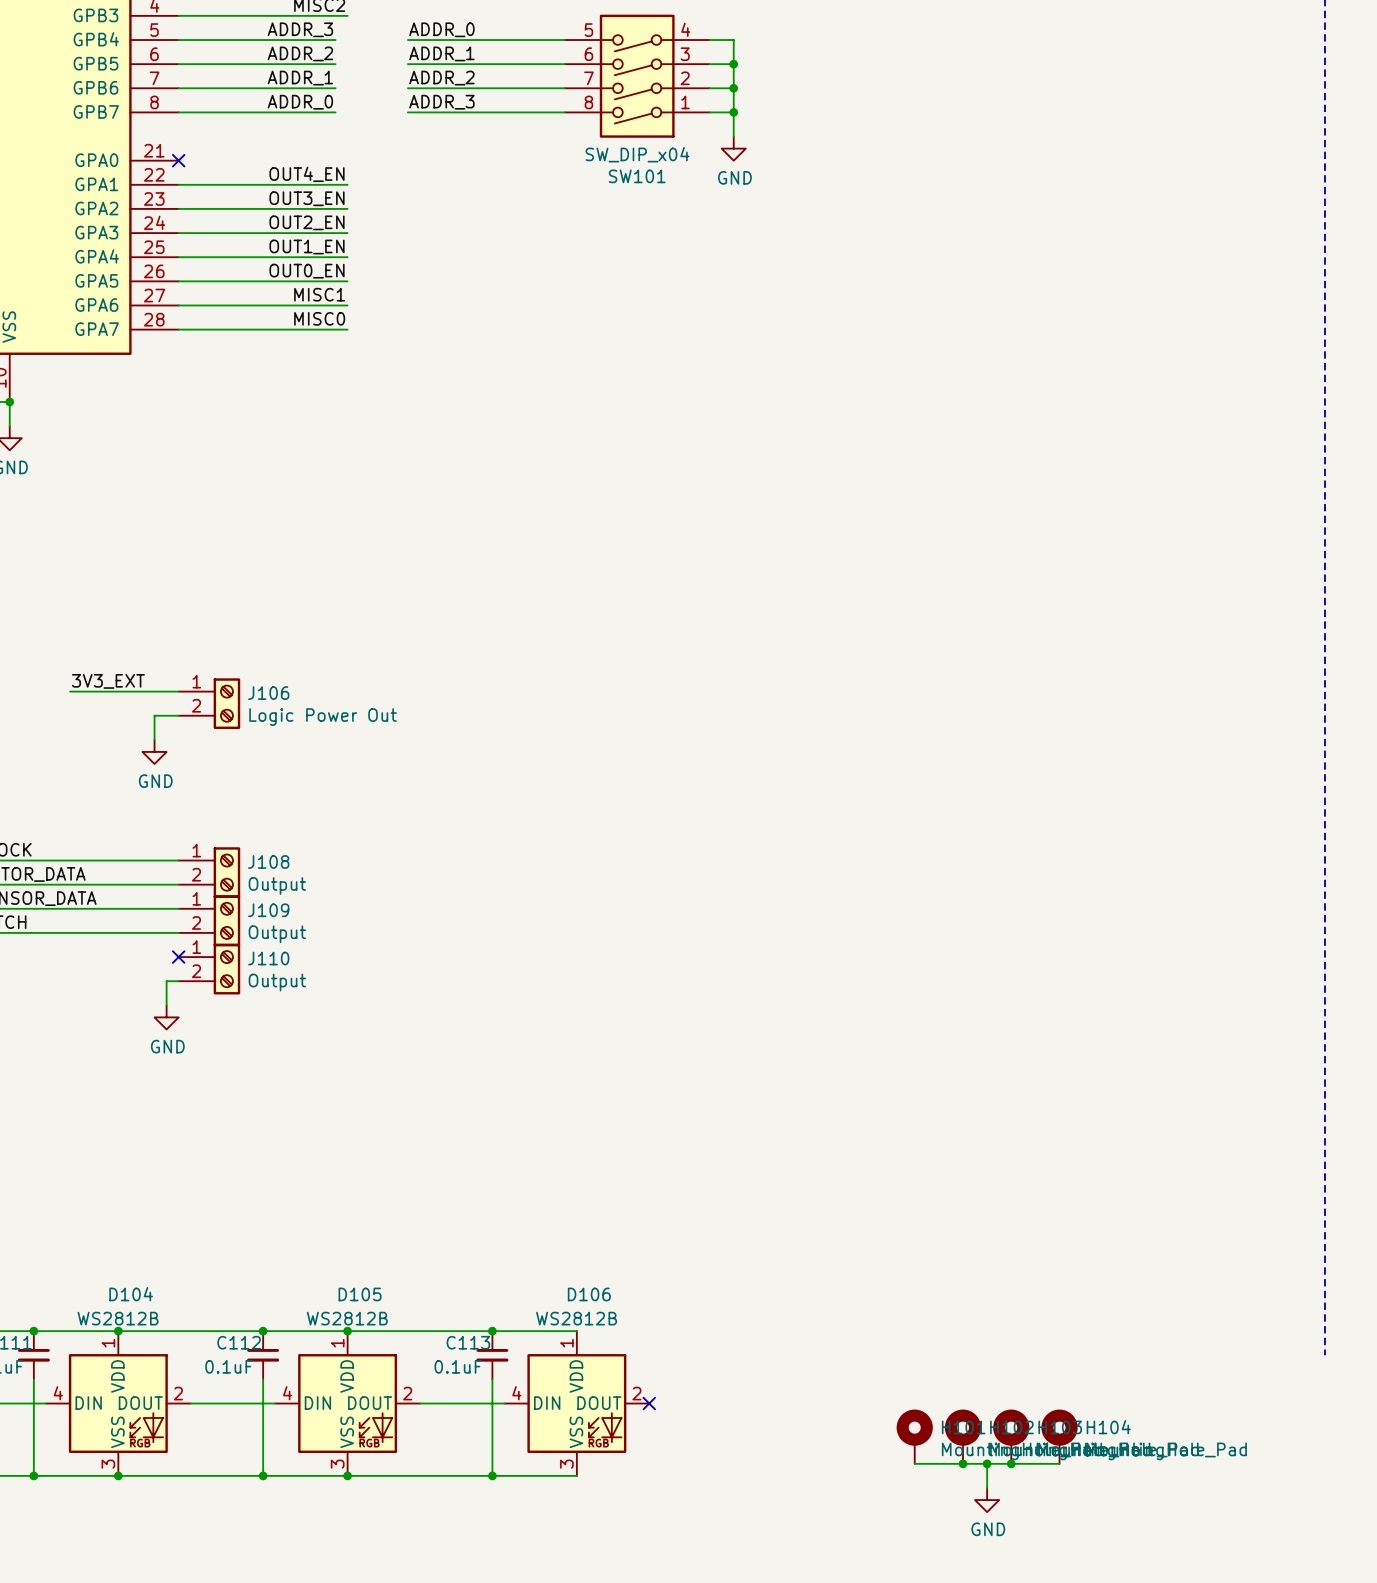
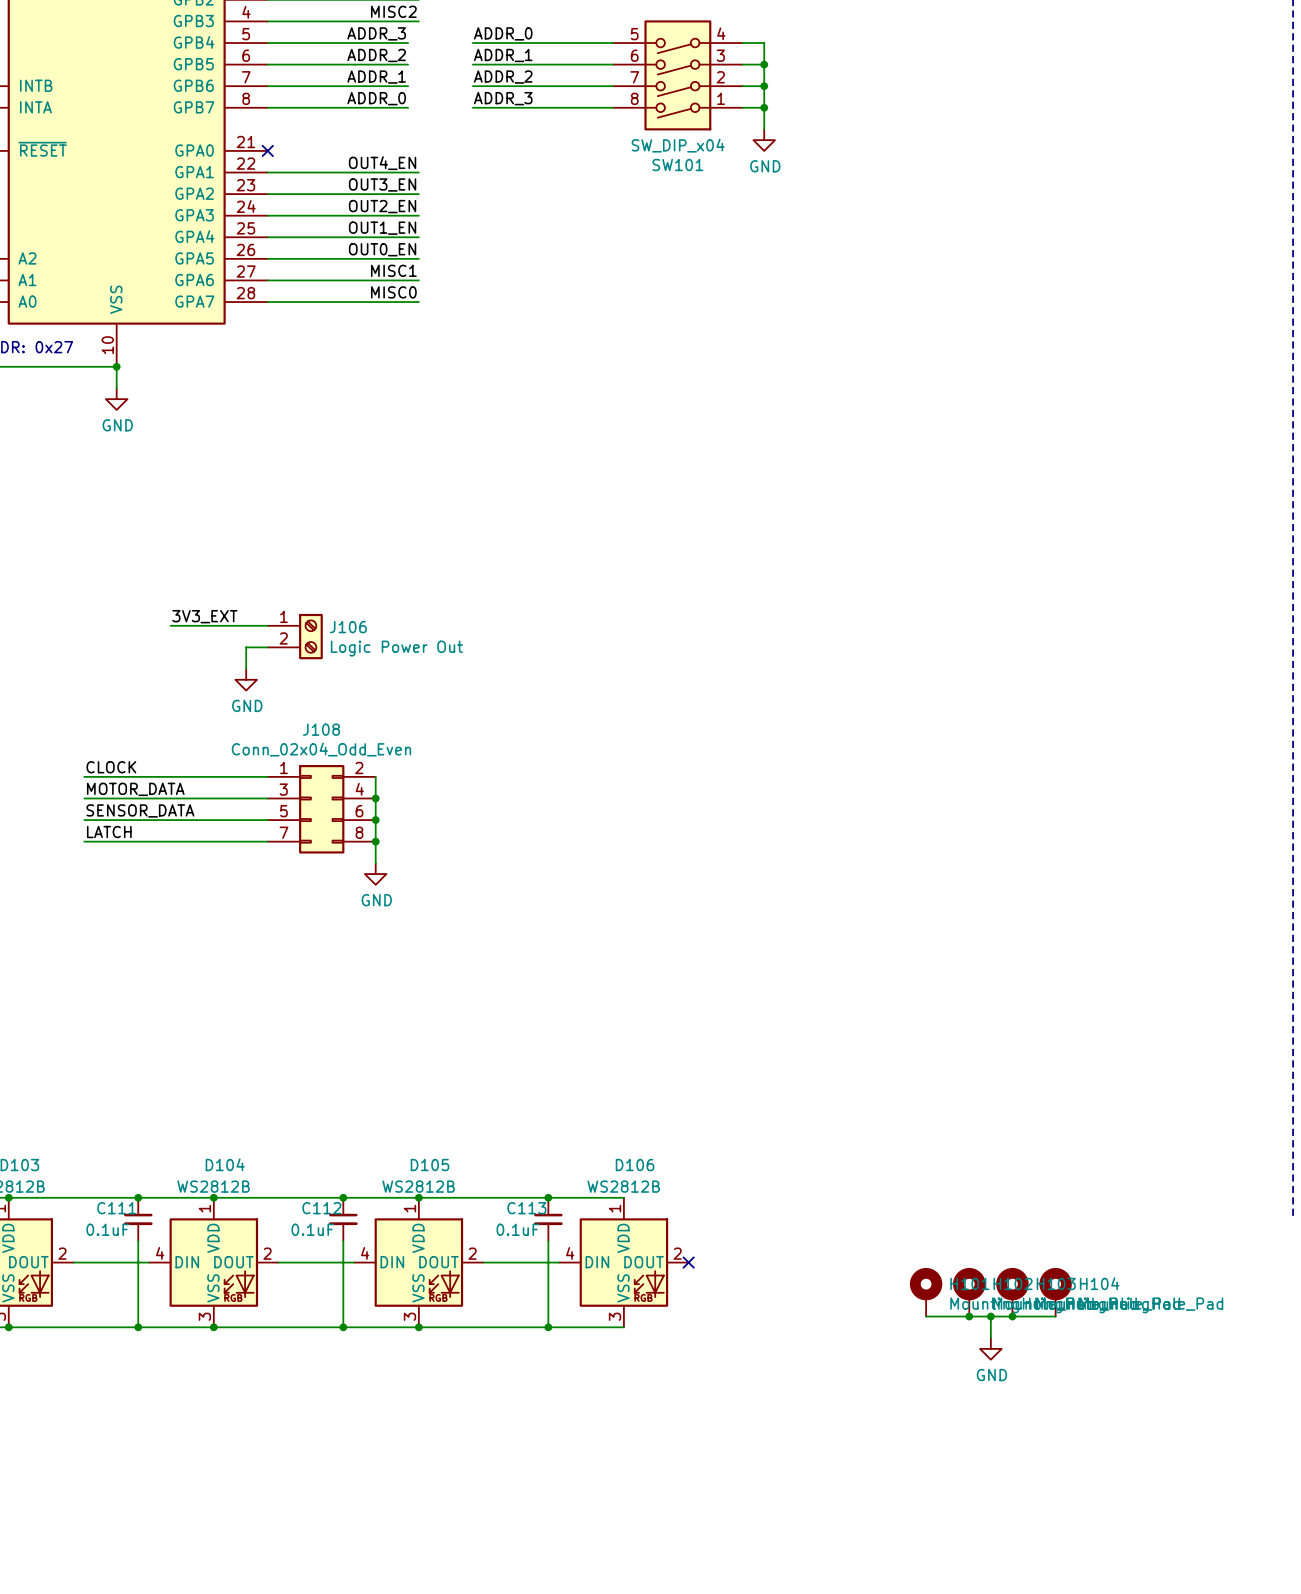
J108 symbol: [178, 847, 241, 898] -> [267, 765, 376, 854]
wire: none -> (375, 776) (375, 863)
J108 name position: J108 (268, 862) -> J108 (321, 729)
junction: none -> (375, 798)
J108 value: Output (277, 885) -> Conn_02x04_Odd_Even (321, 749)
junction: none -> (375, 820)
J109: Output (209, 920) -> none
junction: none -> (375, 841)
no-connect mark: (178, 957) -> none
J110: Output (209, 969) -> none
wire: (178, 981) (166, 981) (166, 1005) -> none
power symbol position: GND (166, 1017) -> GND (375, 874)

